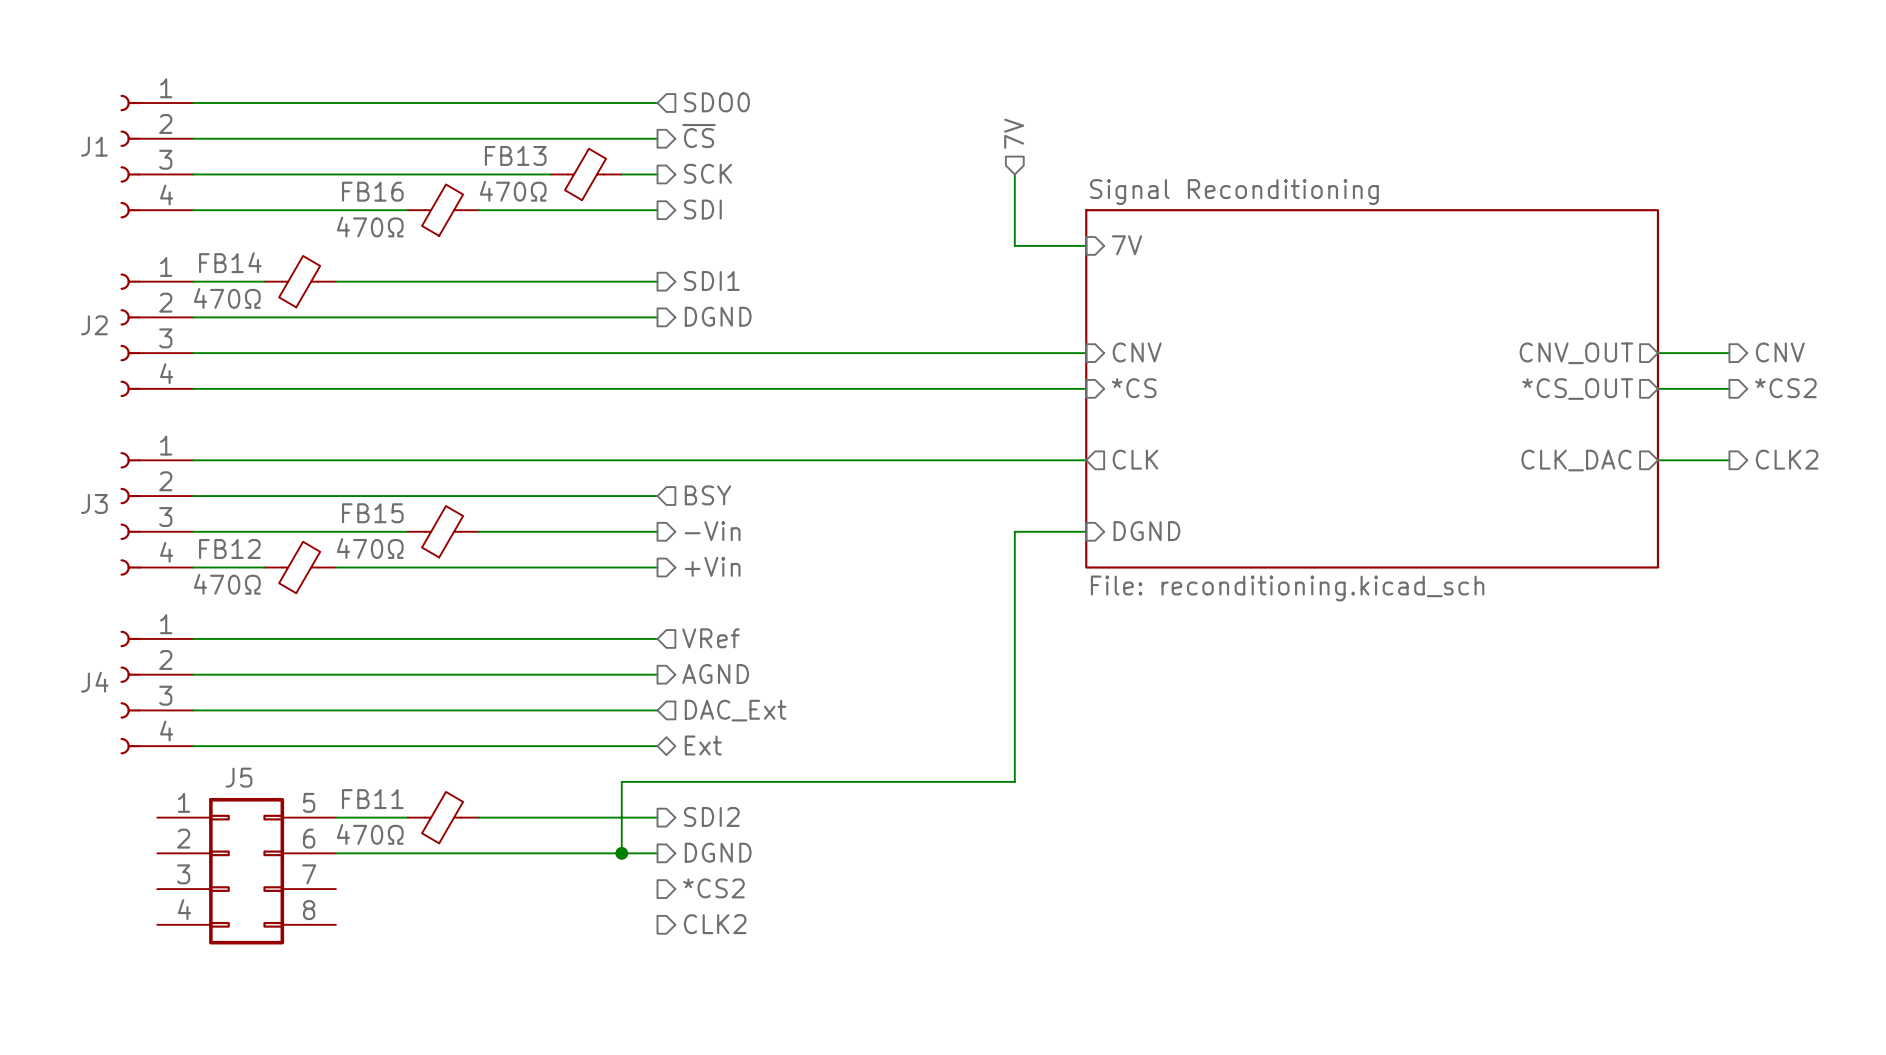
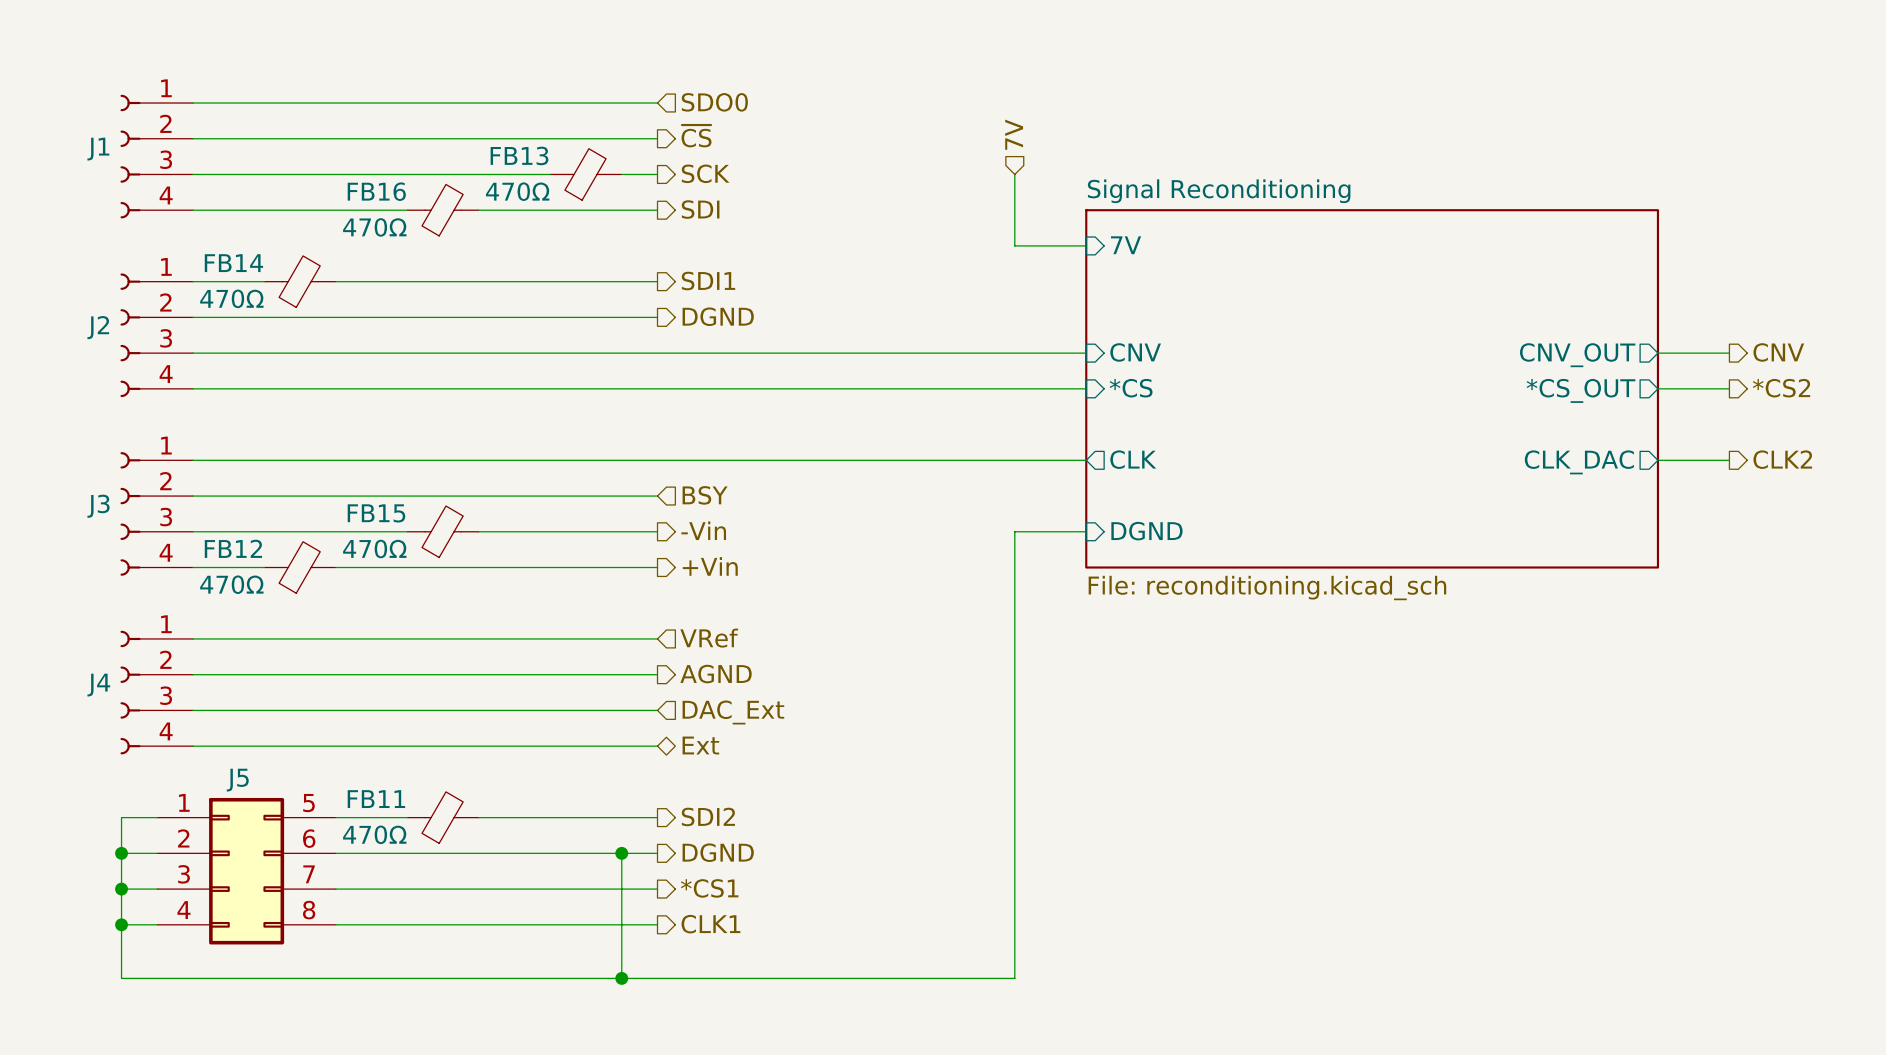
wire: (1014, 781) (621, 781) (621, 853) -> (621, 978) (621, 853)
wire: none -> (1014, 781) (1014, 978) (121, 978) (121, 817) (157, 817)
wire: none -> (121, 853) (157, 853)
junction: none -> (121, 853)
hierarchical label: *CS2 (713, 888) -> *CS1 (709, 888)
wire: none -> (121, 889) (157, 889)
junction: none -> (121, 889)
wire: none -> (335, 889) (657, 889)
wire: none -> (121, 924) (157, 924)
junction: none -> (121, 924)
wire: none -> (335, 924) (657, 924)
hierarchical label: CLK2 (715, 924) -> CLK1 (710, 924)
junction: none -> (621, 978)

